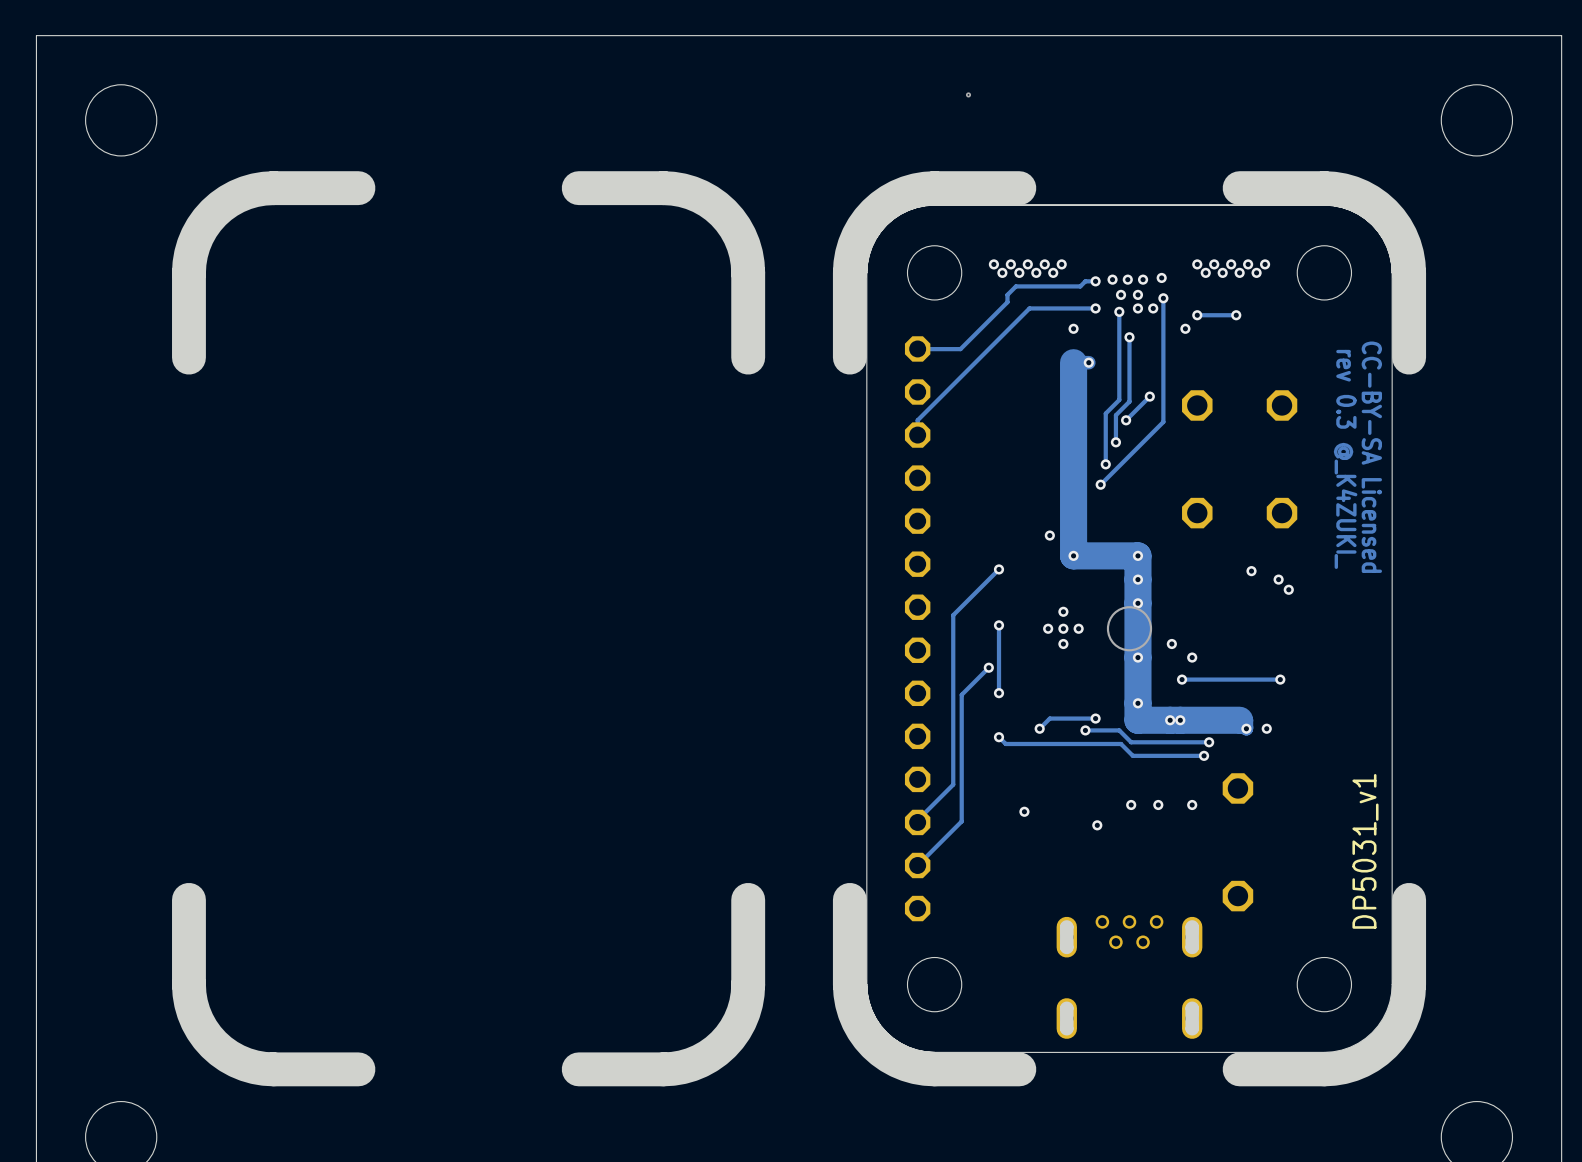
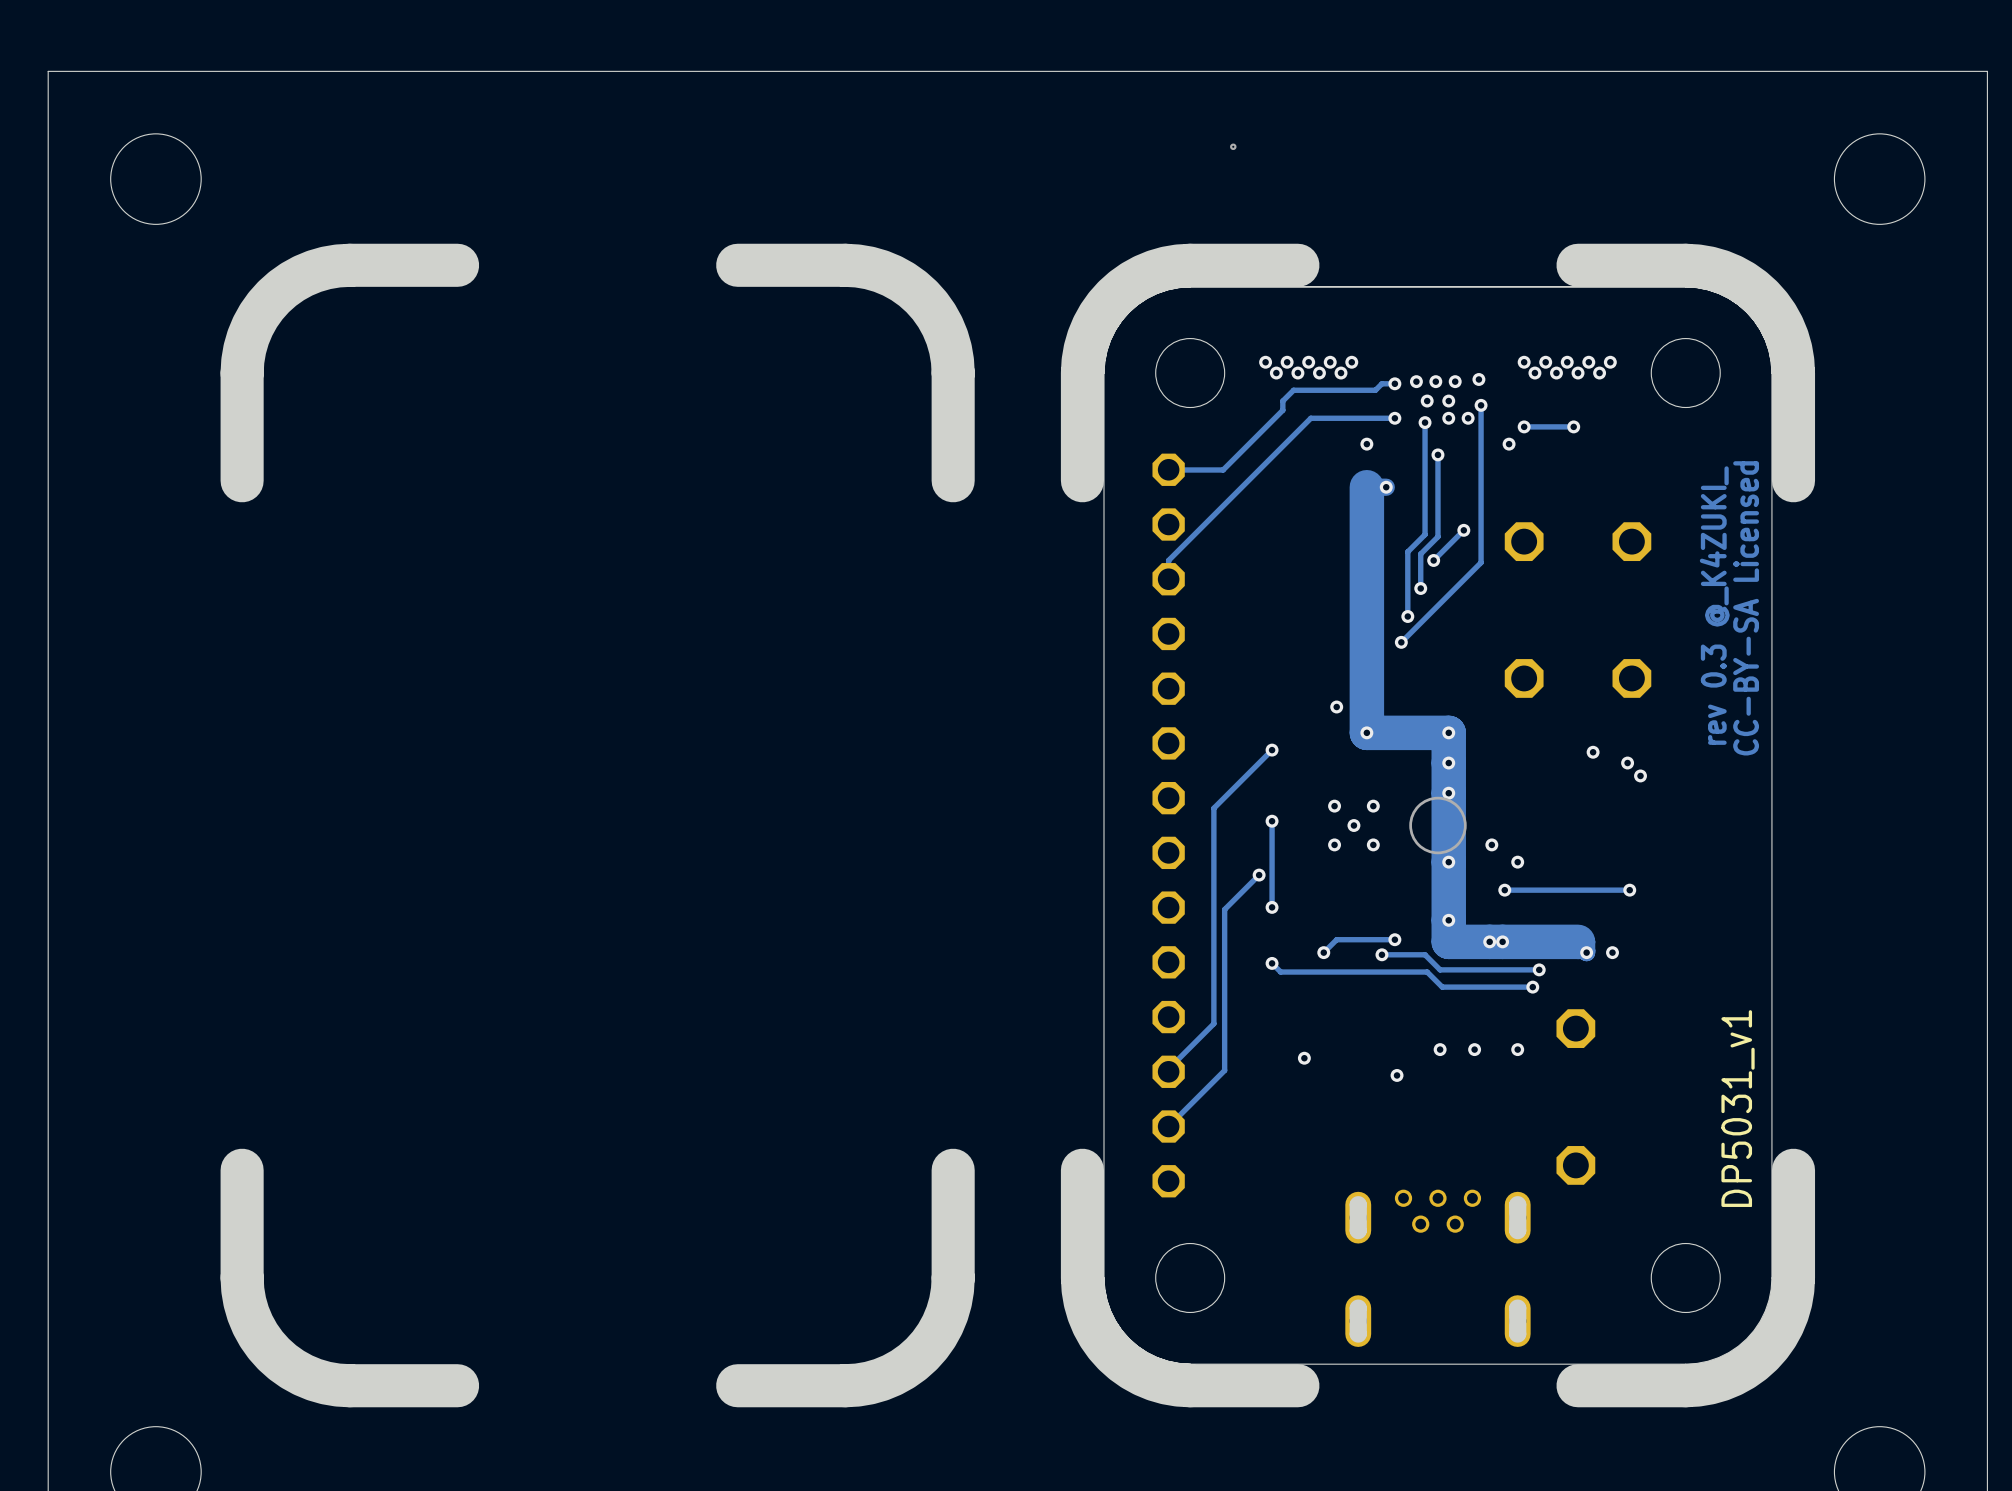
text rotation: 0° (1371, 457) -> 180° (1746, 608)
text rotation: 0° (1345, 459) -> 180° (1714, 605)
via: (1063, 611) -> none
via: none -> (1334, 806)
via: none -> (1373, 806)
via: (1048, 628) -> none
via: (1078, 628) -> none
via: none -> (1334, 844)
via: (1063, 644) -> none
via: none -> (1373, 844)

